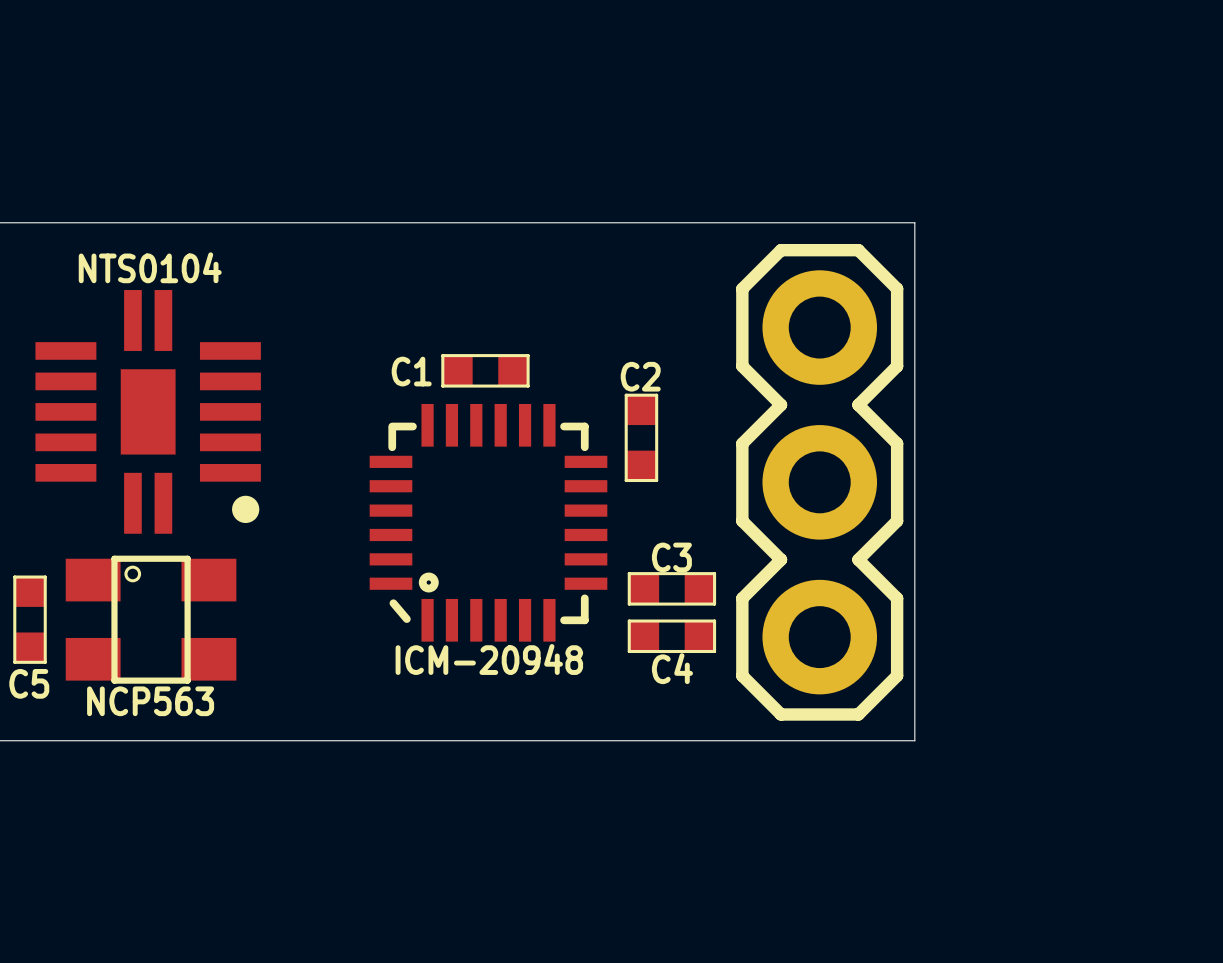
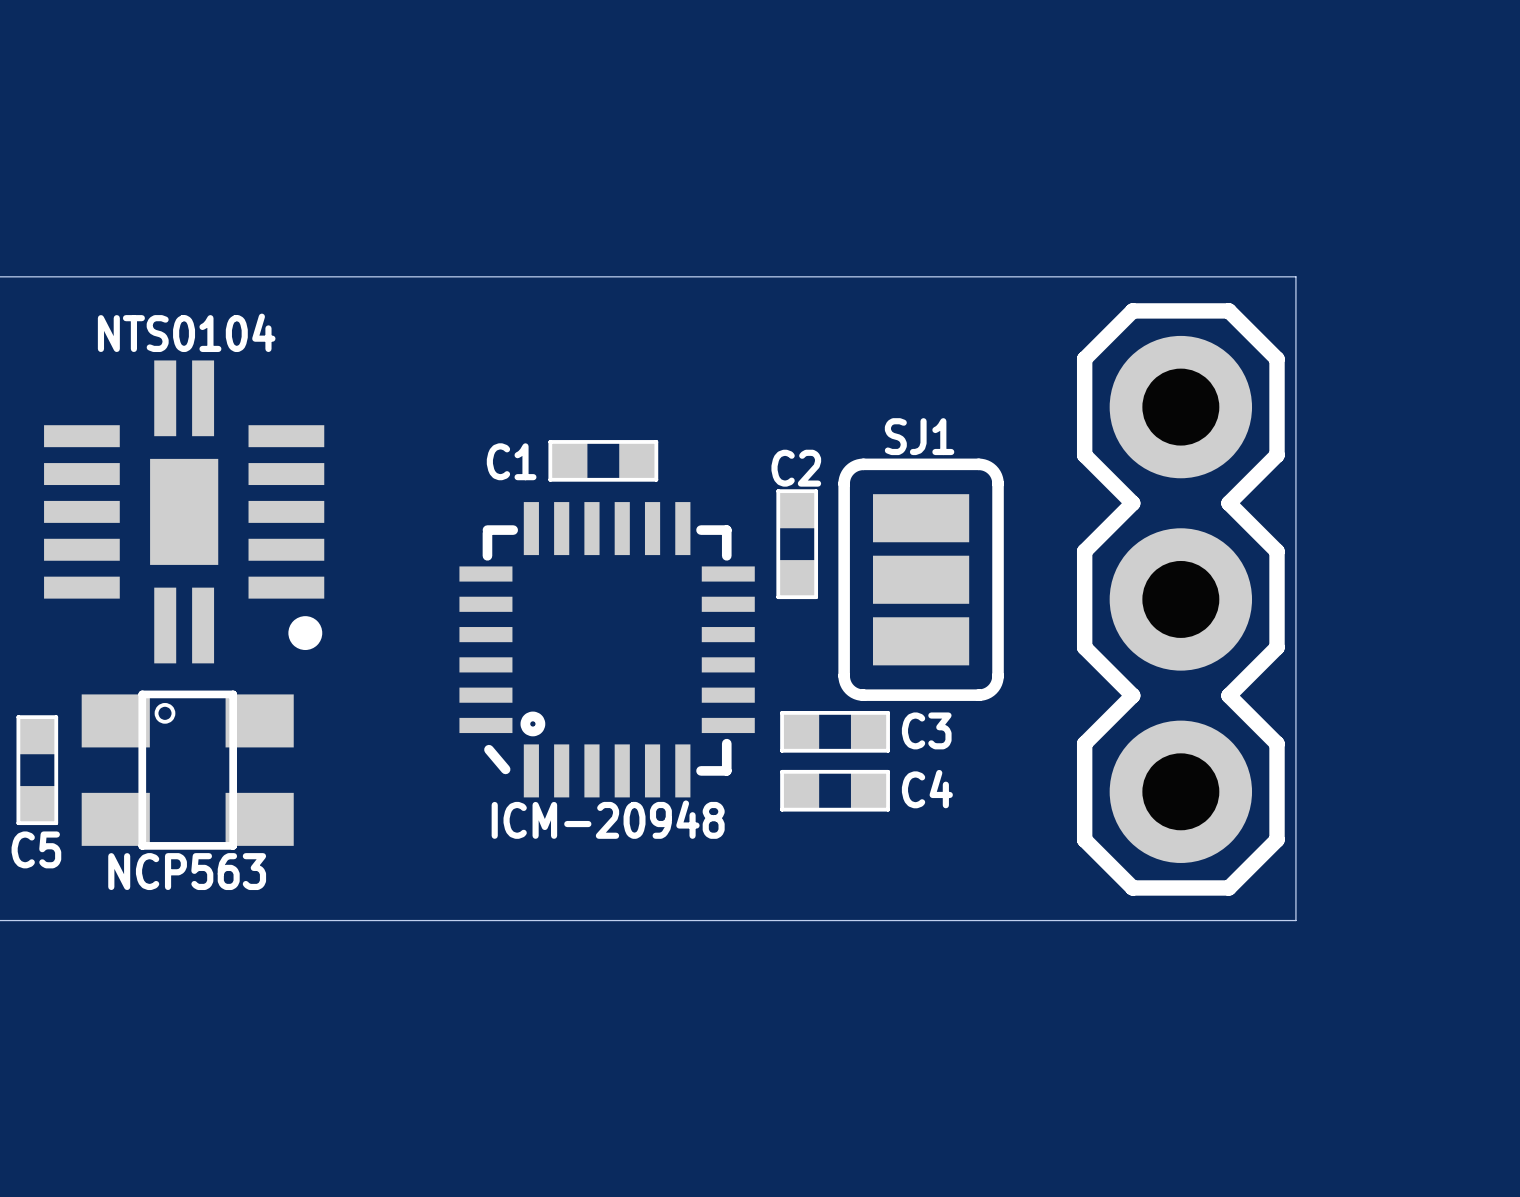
board edge: (914, 222) (914, 740) -> (1136, 276) (1295, 276) (1295, 920) (1136, 920)
SJ1: none -> (921, 579)
part position: (819, 482) -> (1180, 599)
C3 name position: C3 (671, 557) -> C3 (926, 730)
C4 name position: C4 (672, 668) -> C4 (927, 789)

